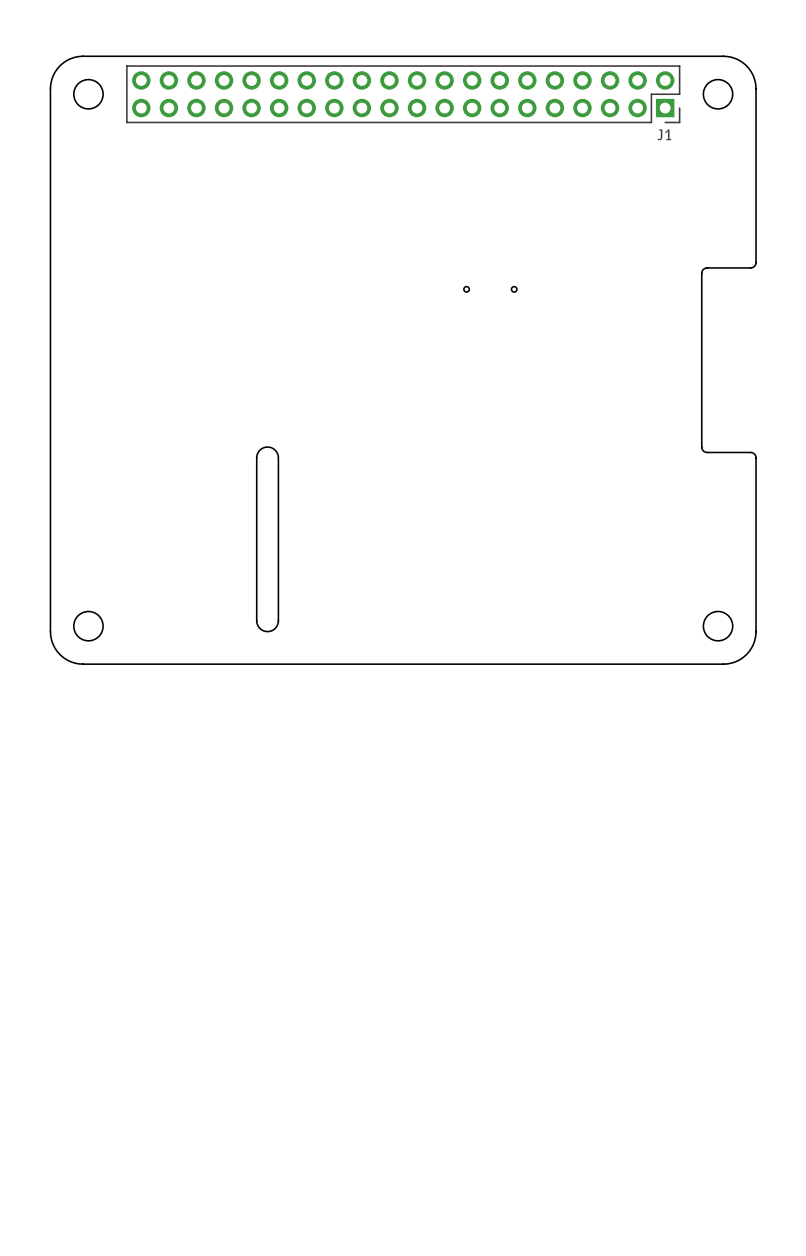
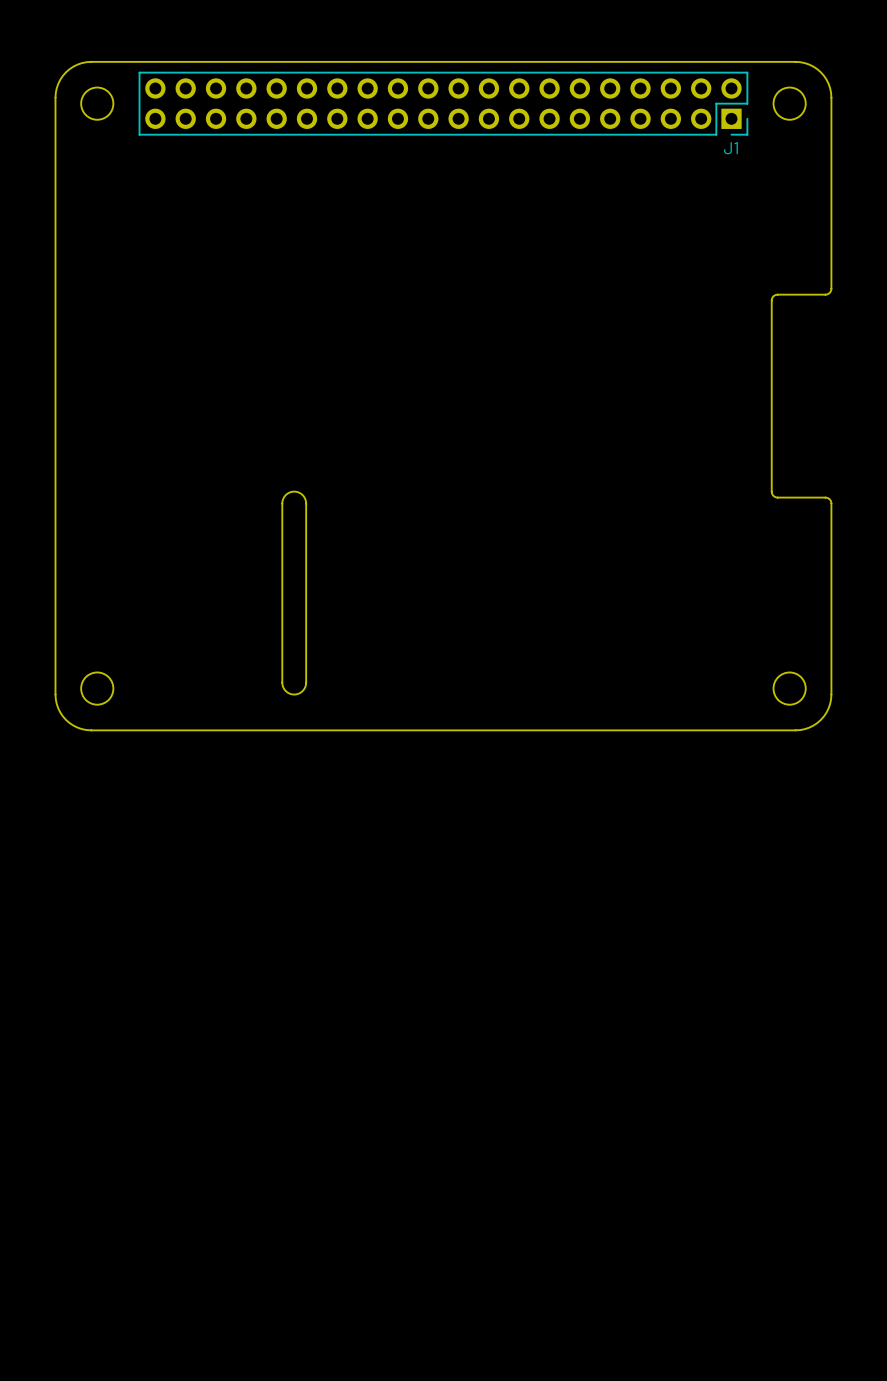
part: (466, 289) -> none
part: (514, 289) -> none

